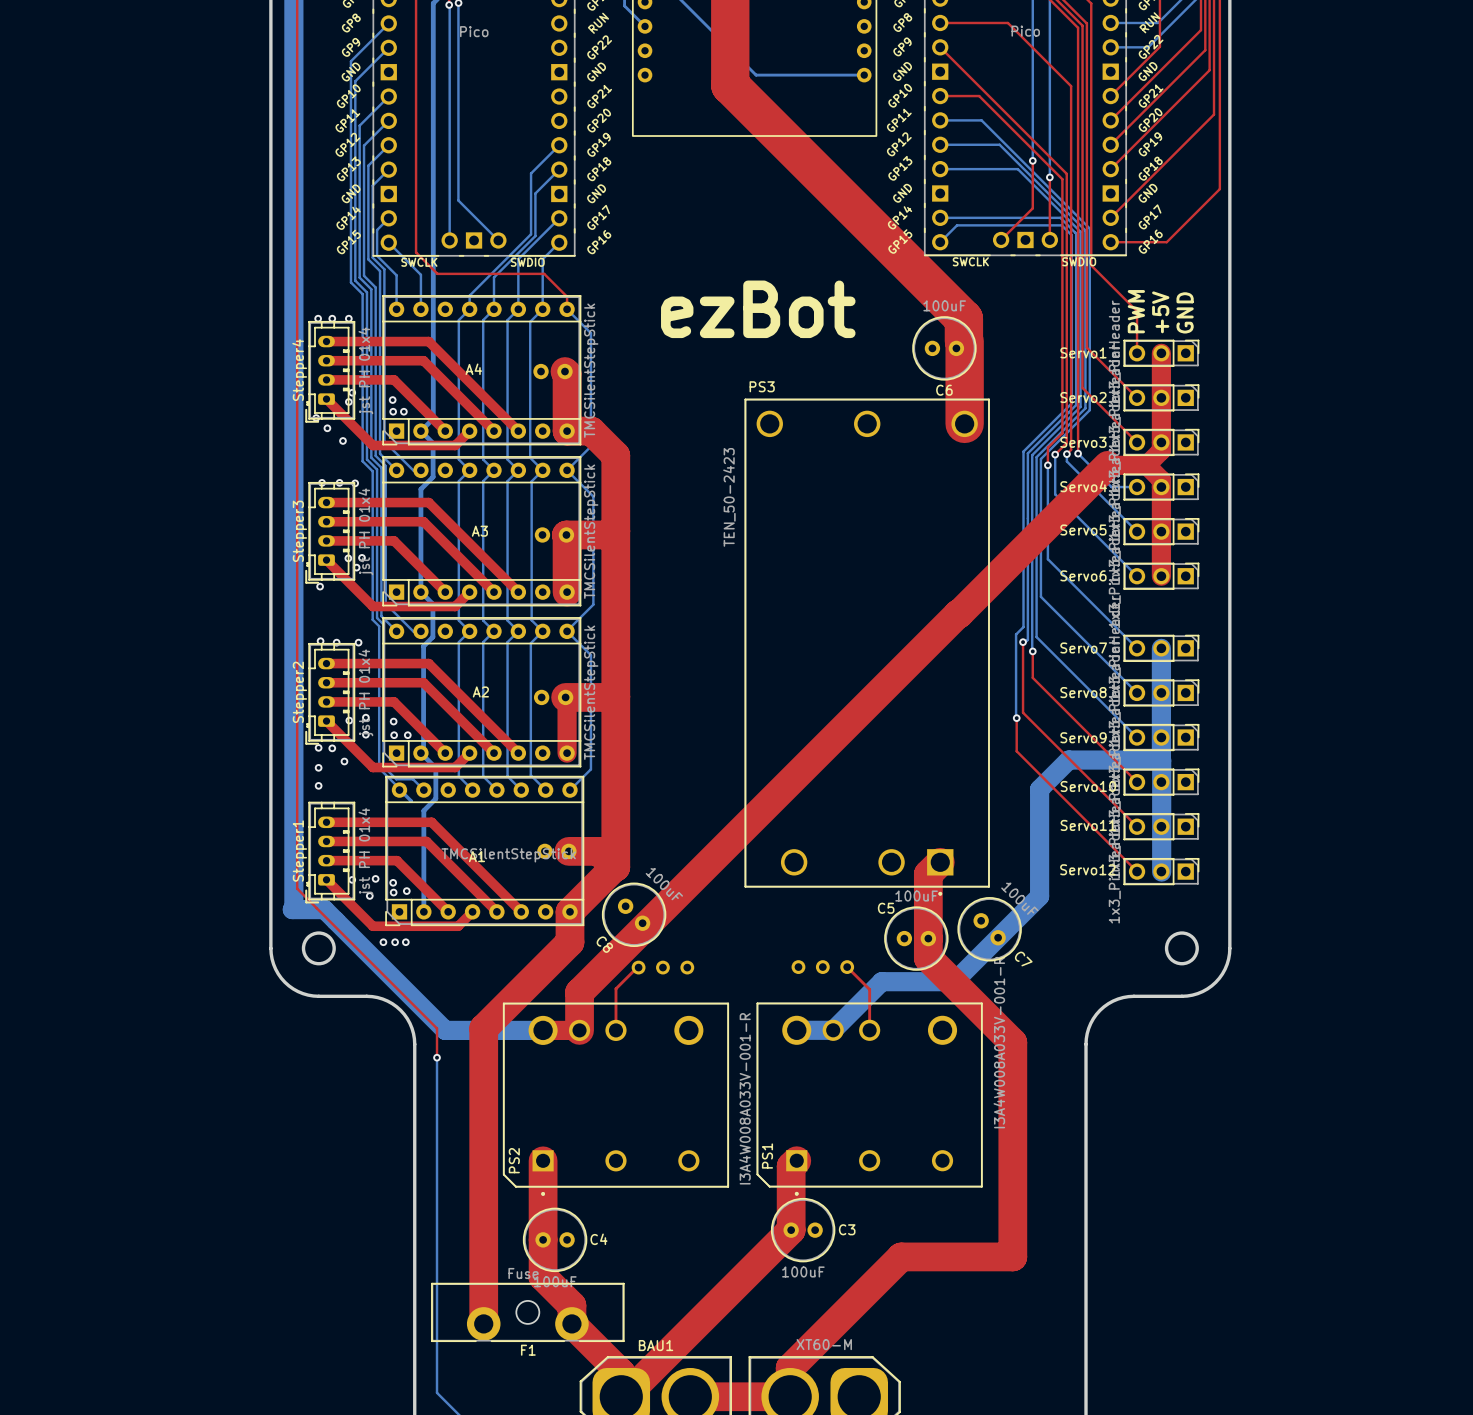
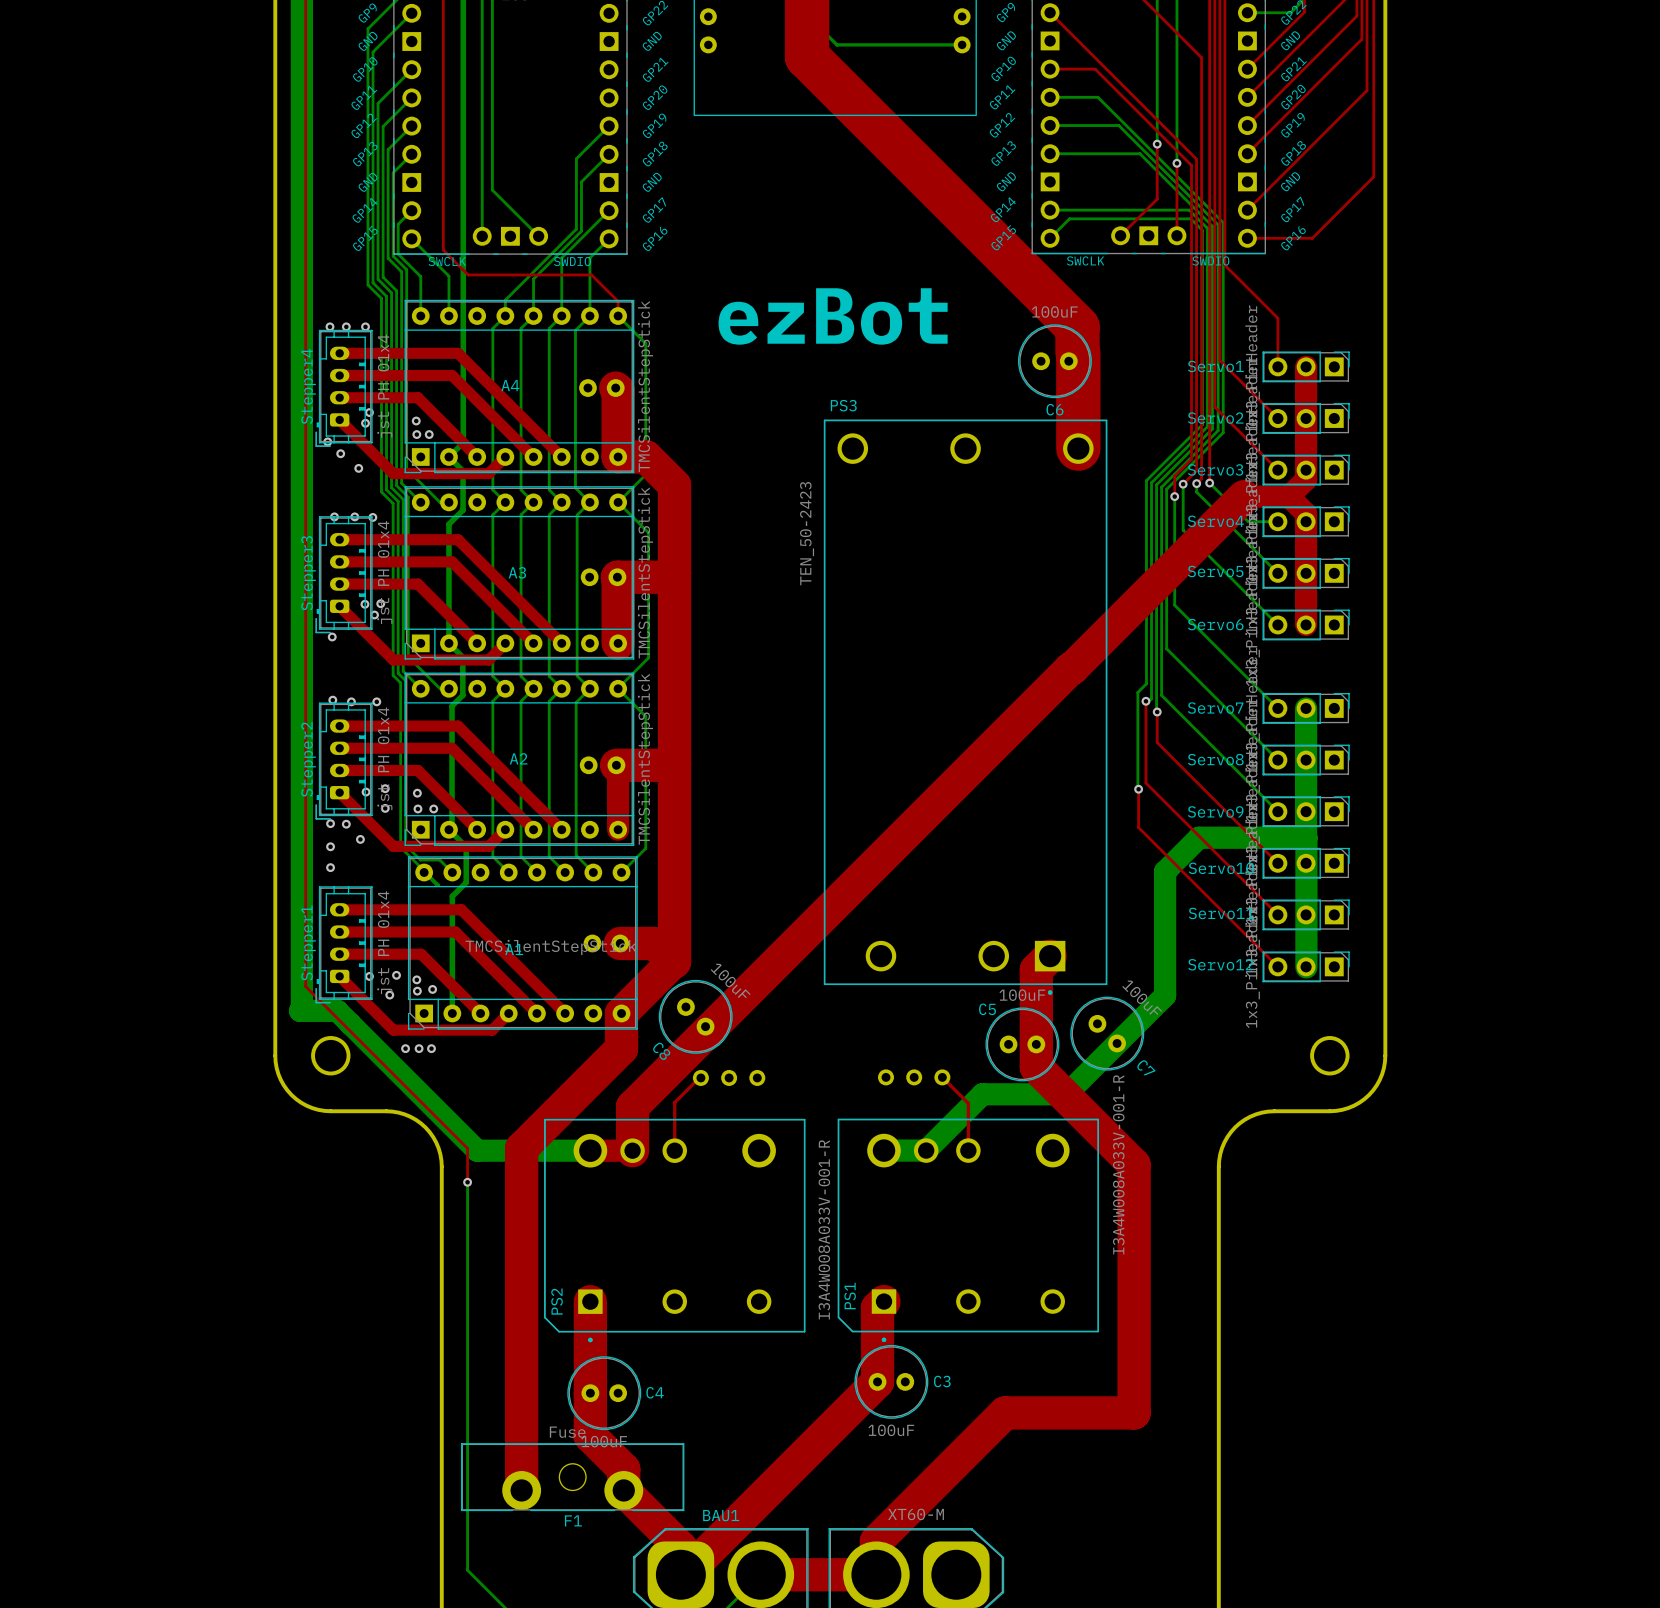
text: PWM (1136, 311) -> none
text: +5V (1160, 312) -> none
text: GND (1185, 312) -> none

